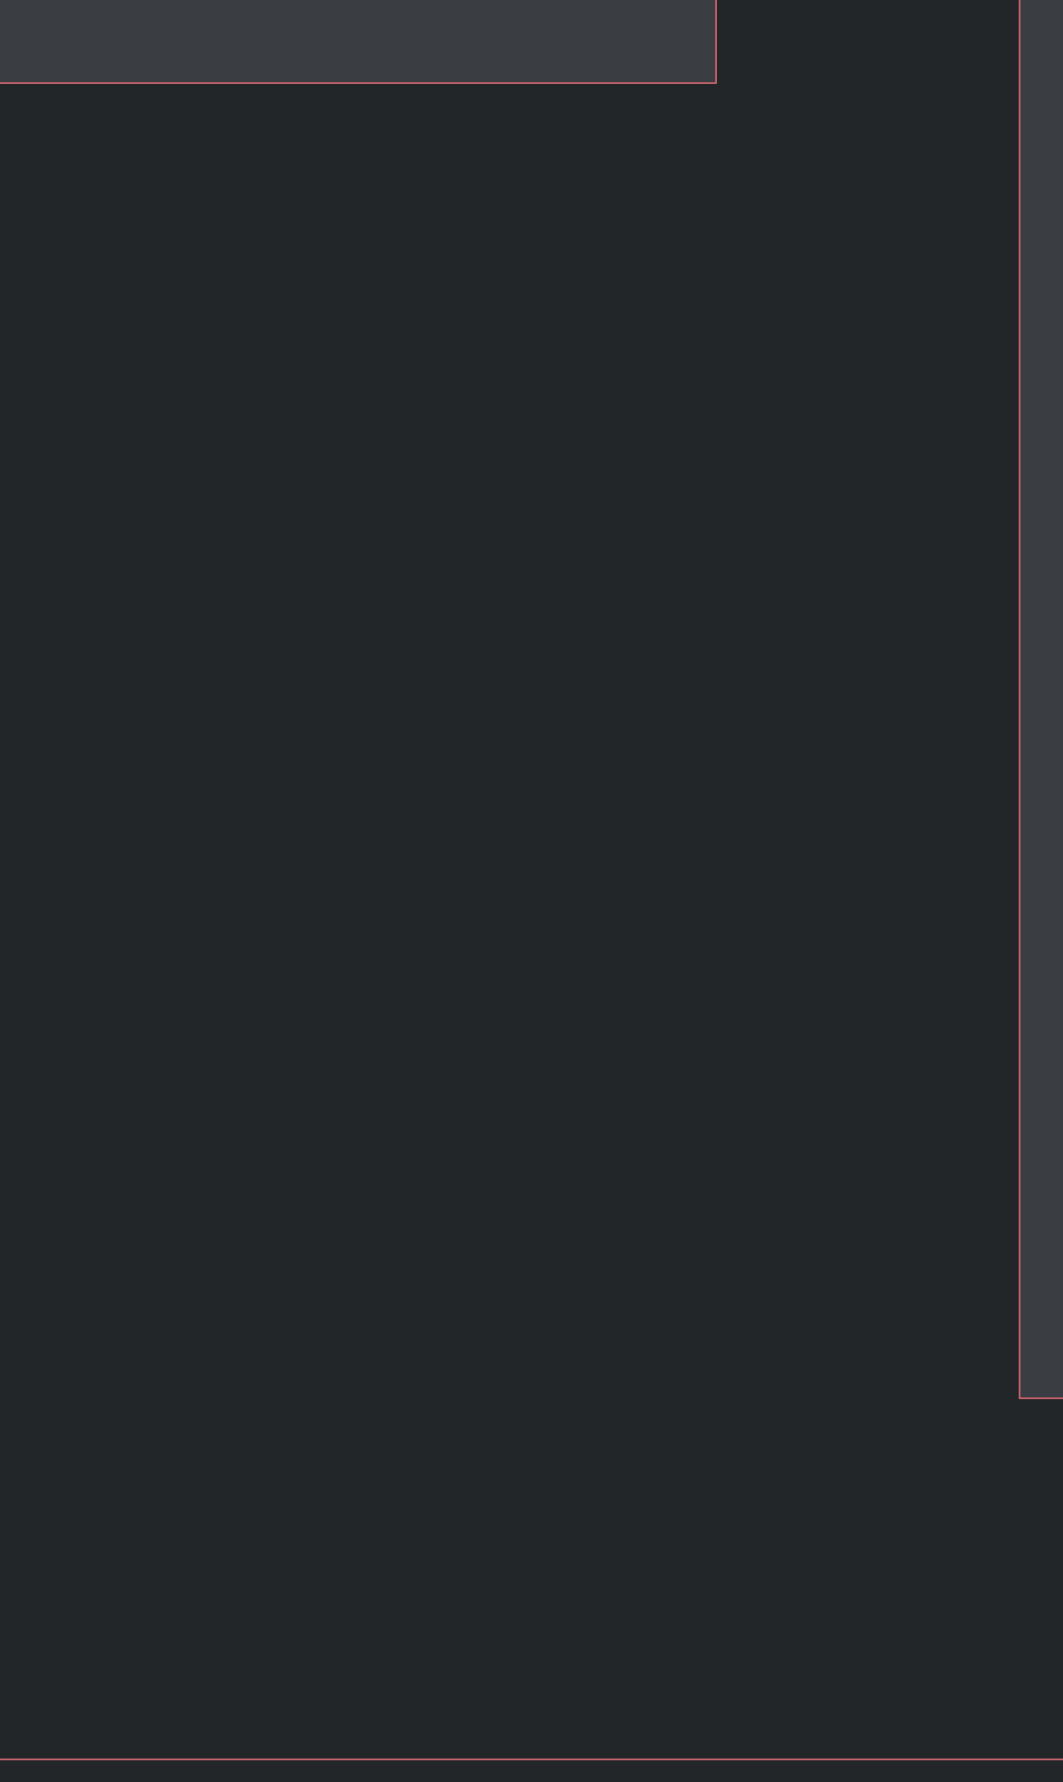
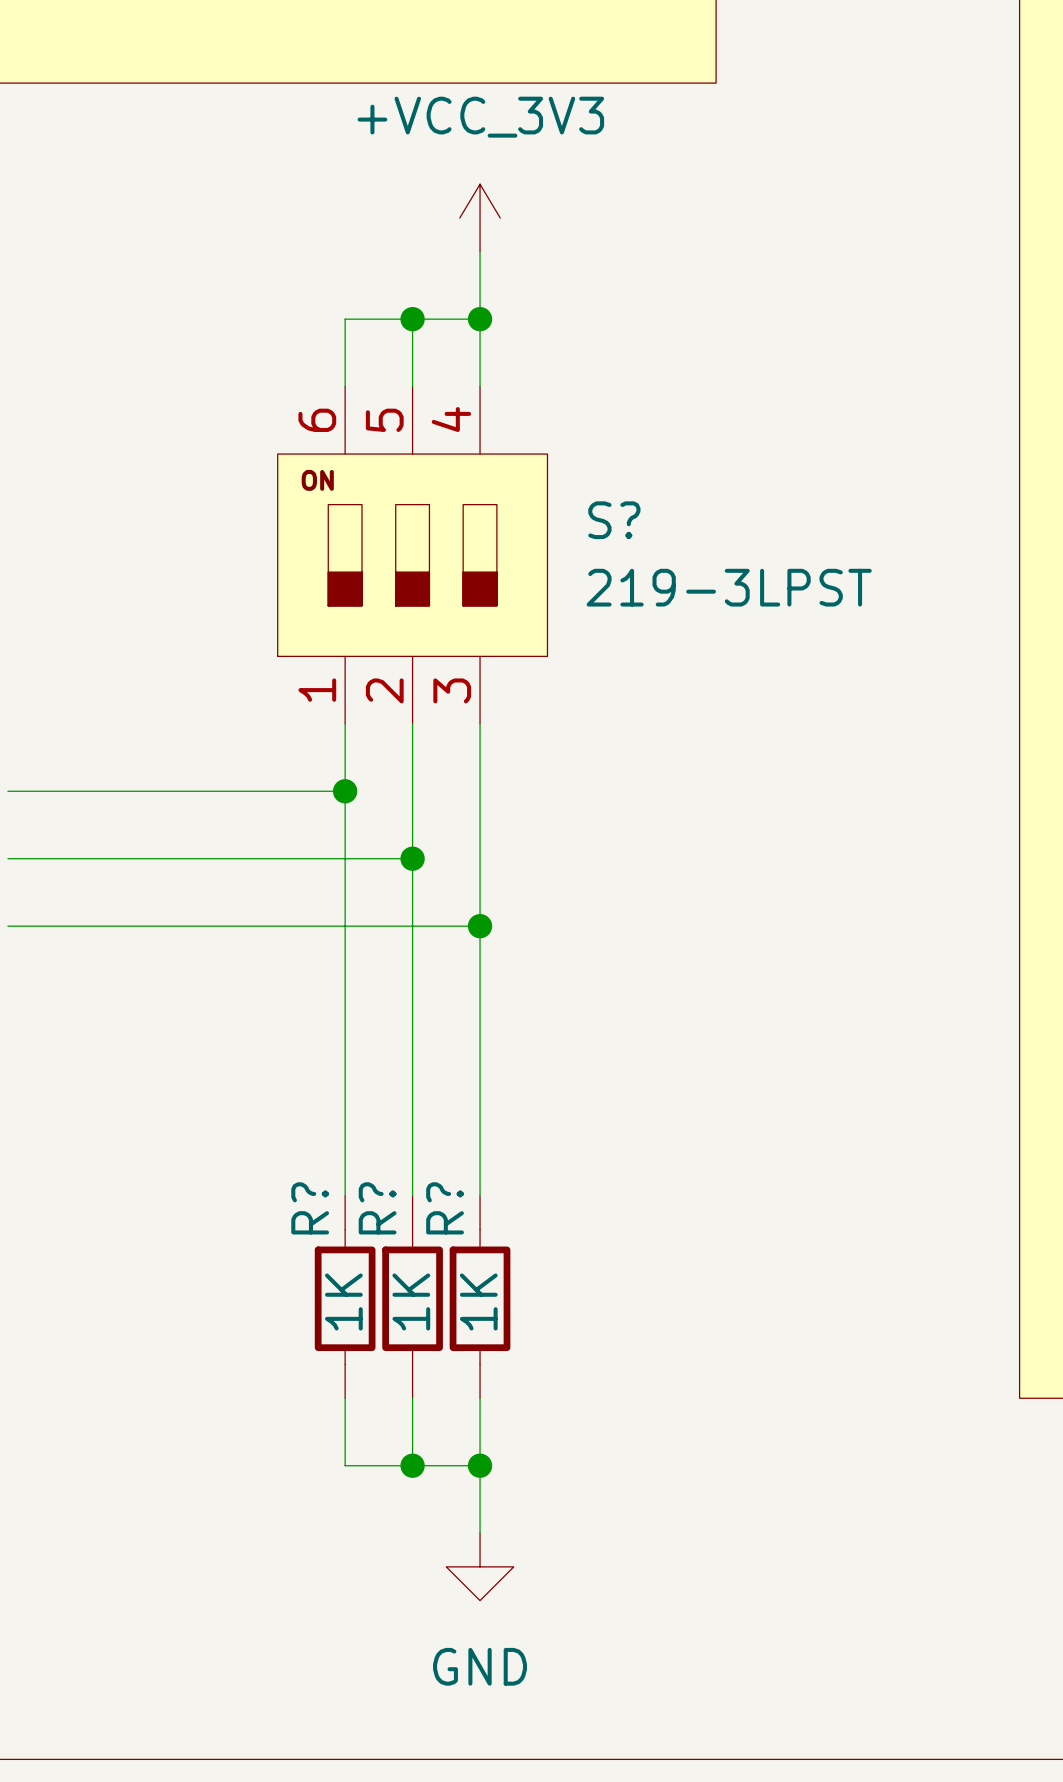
power symbol: none -> +VCC_3V3 (480, 217)
wire: none -> (480, 251) (480, 386)
wire: none -> (412, 319) (412, 386)
junction: none -> (412, 319)
wire: none -> (480, 319) (345, 319) (345, 386)
junction: none -> (480, 319)
S?: none -> 219-3LPST (412, 555)
wire: none -> (345, 723) (345, 1195)
wire: none -> (412, 723) (412, 1195)
wire: none -> (480, 723) (480, 1195)
wire: none -> (7, 791) (345, 791)
junction: none -> (345, 791)
wire: none -> (7, 858) (412, 858)
junction: none -> (412, 858)
wire: none -> (7, 926) (480, 926)
junction: none -> (480, 926)
R?: none -> (345, 1297)
R?: none -> (412, 1297)
R?: none -> (480, 1297)
wire: none -> (345, 1398) (345, 1465) (480, 1465)
wire: none -> (412, 1398) (412, 1465)
wire: none -> (480, 1398) (480, 1533)
junction: none -> (412, 1465)
junction: none -> (480, 1465)
power symbol: none -> GND (480, 1566)

